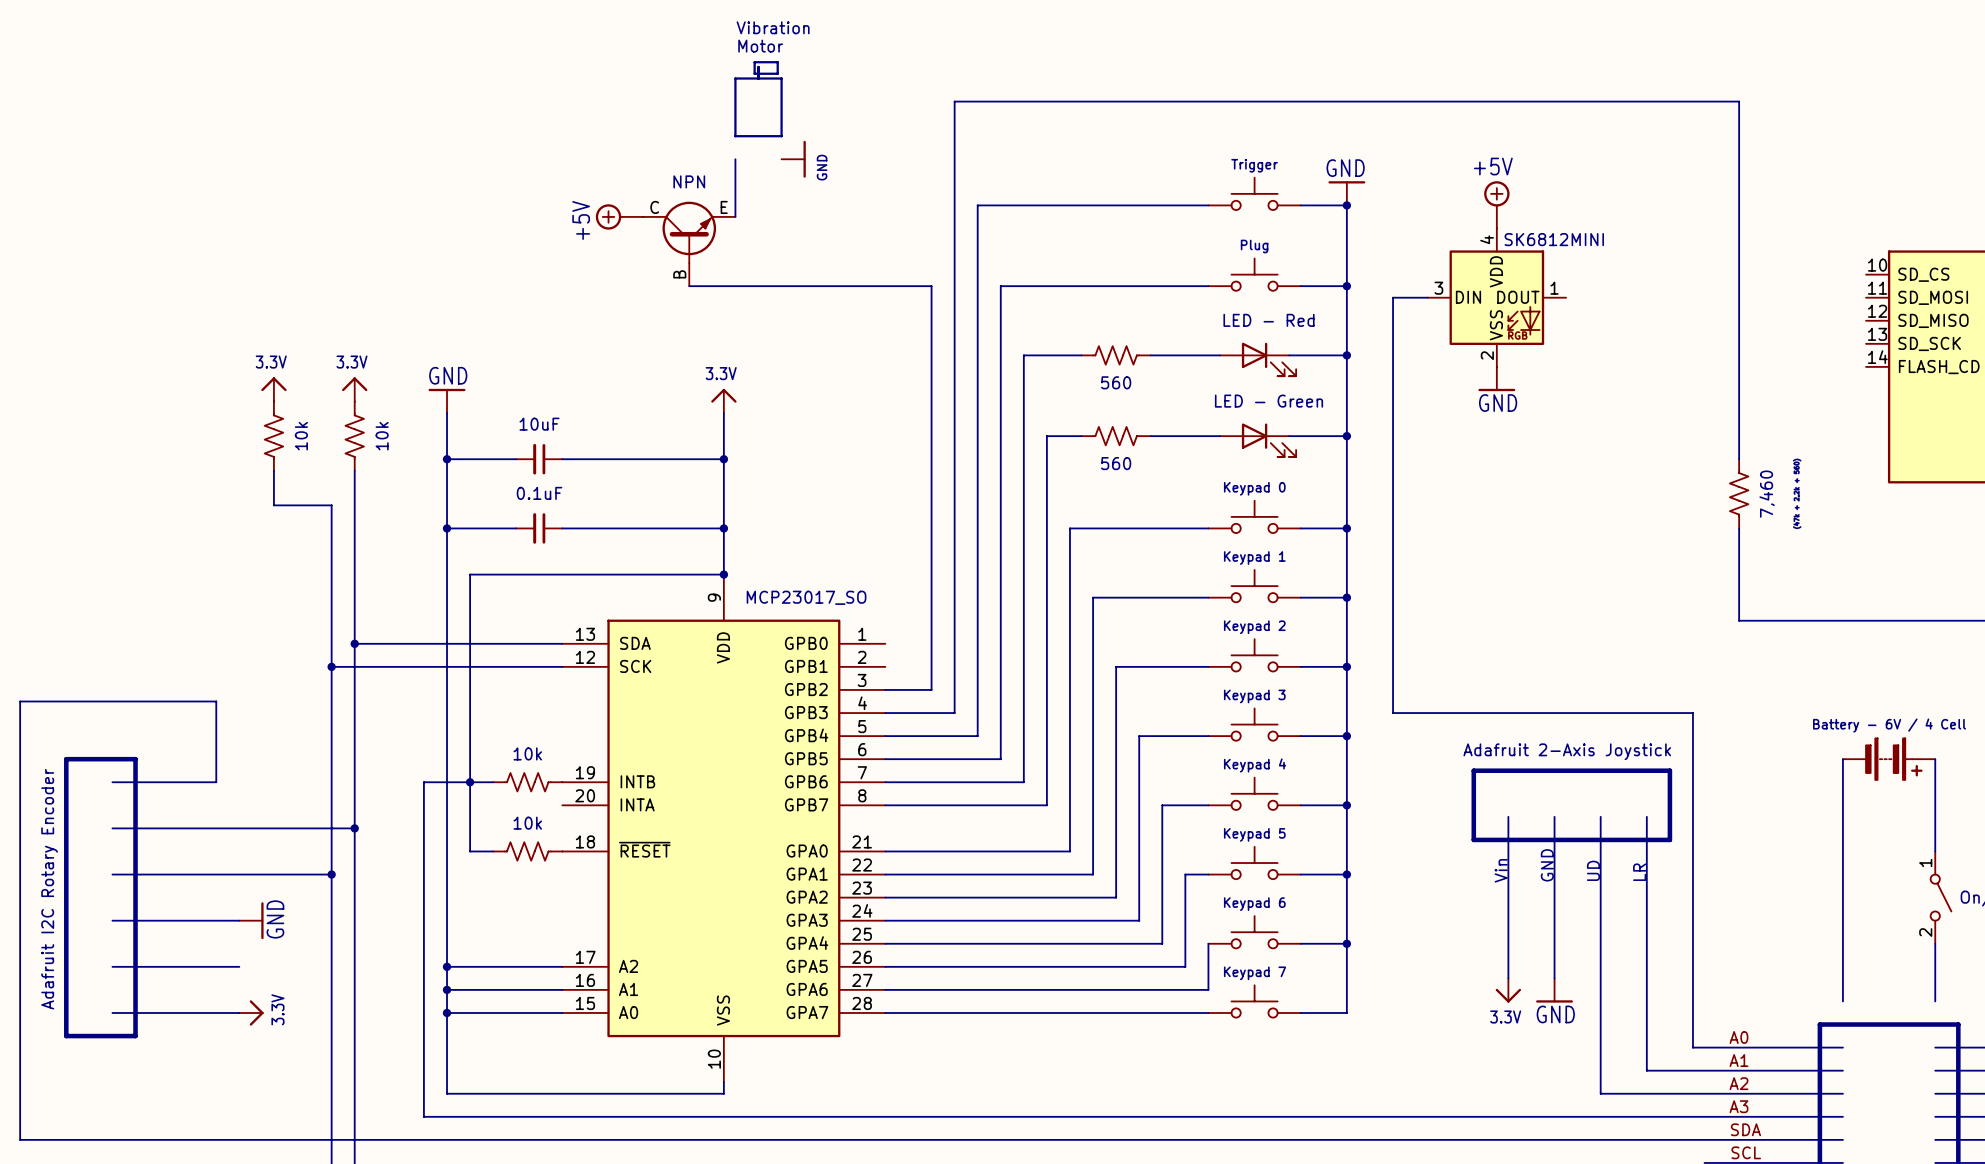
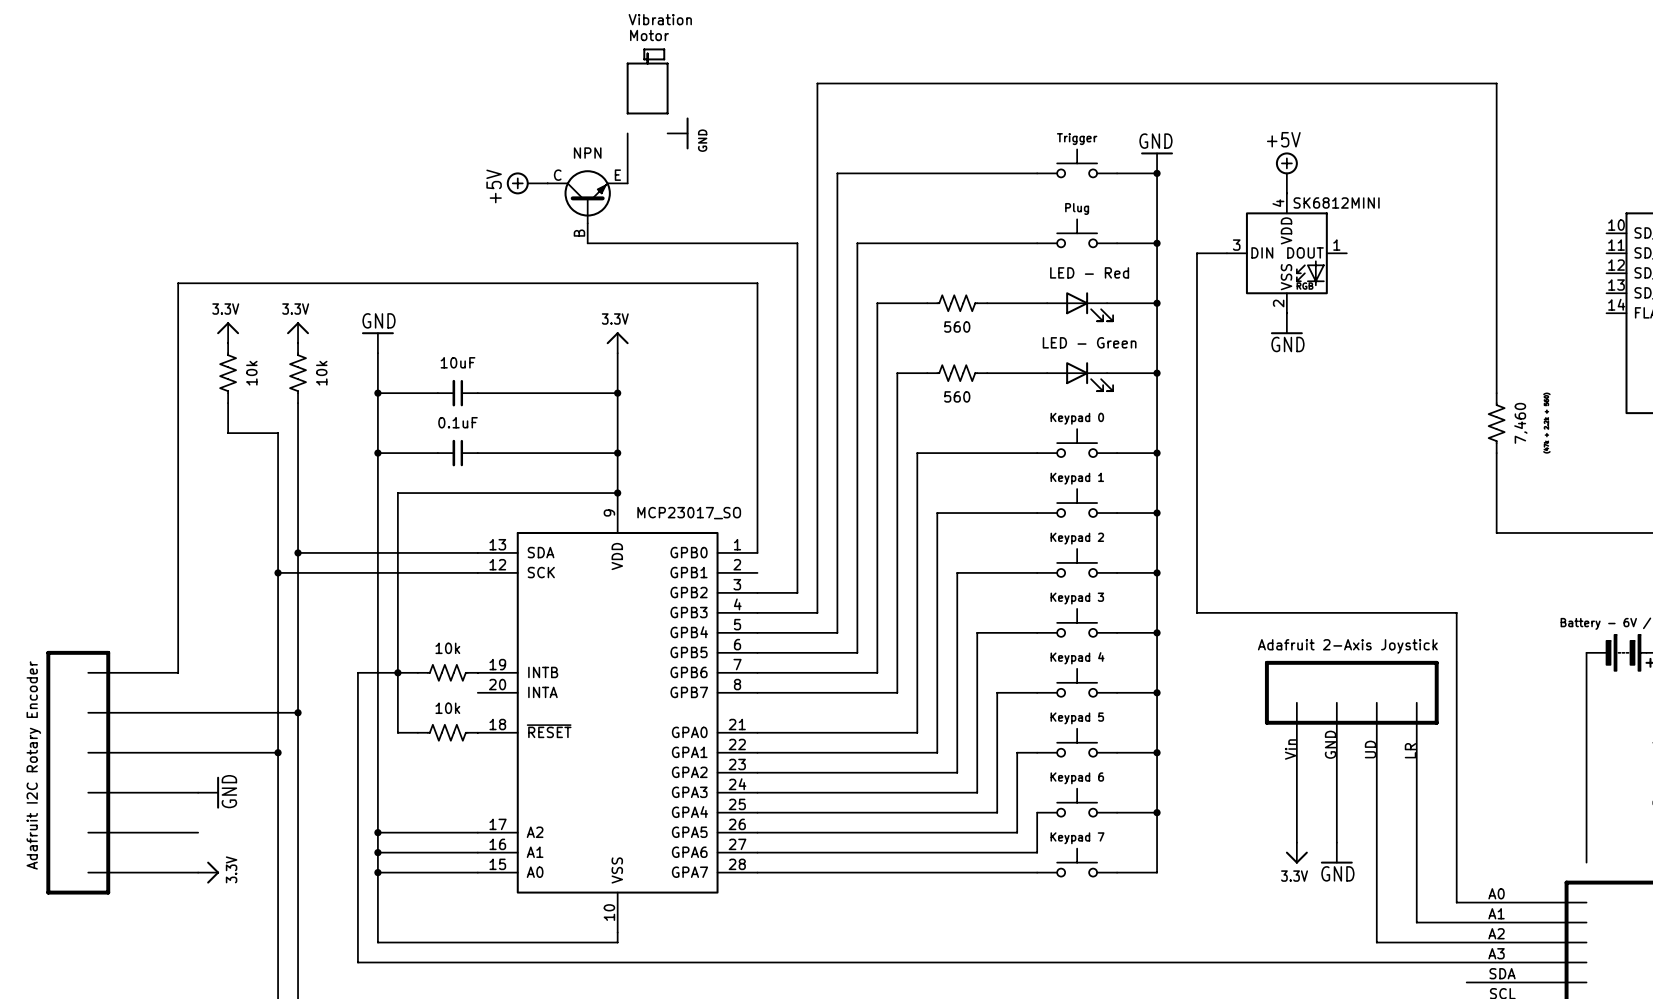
wire: (216, 701) (20, 701) (20, 1139) (1704, 1139) -> (178, 602) (178, 283) (757, 283) (757, 552)

